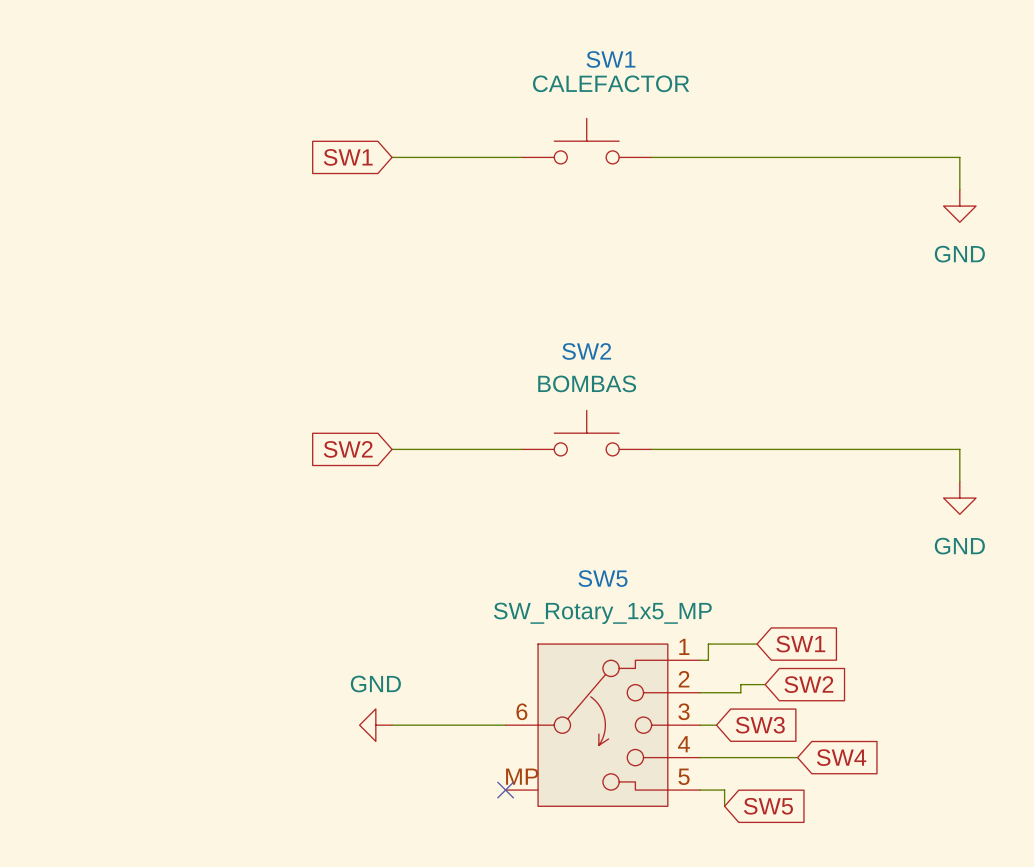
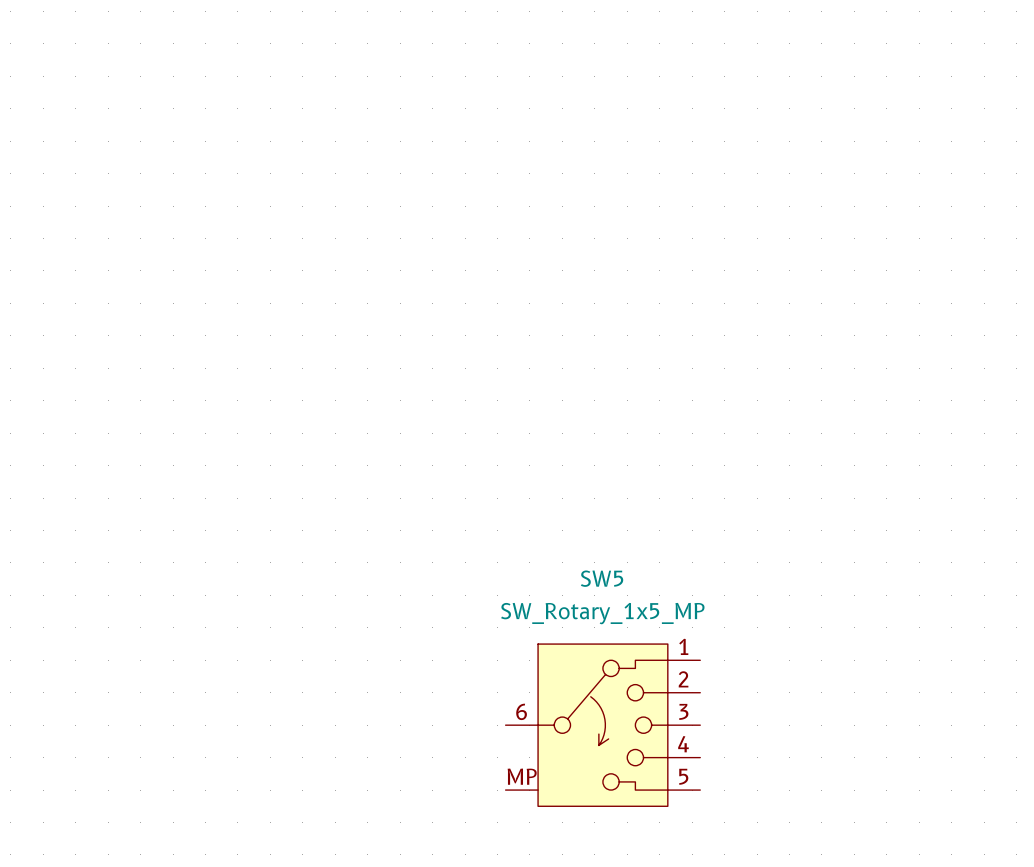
SW1: CALEFACTOR (586, 141) -> none
global label: SW1 (348, 157) -> none
wire: (392, 157) (521, 157) -> none
wire: (651, 157) (959, 157) (959, 189) -> none
power symbol: GND (959, 206) -> none
SW2: BOMBAS (586, 433) -> none
global label: SW2 (348, 449) -> none
wire: (392, 449) (521, 449) -> none
wire: (651, 449) (959, 449) (959, 481) -> none
power symbol: GND (959, 498) -> none
wire: (757, 644) (708, 644) (708, 660) (700, 660) -> none
global label: SW1 (800, 644) -> none
wire: (765, 684) (740, 684) (740, 692) (700, 692) -> none
global label: SW2 (808, 684) -> none
power symbol: GND (375, 725) -> none
wire: (392, 725) (505, 725) -> none
wire: (700, 725) (716, 725) -> none
global label: SW3 (760, 725) -> none
wire: (700, 757) (797, 757) -> none
global label: SW4 (841, 757) -> none
no-connect mark: (505, 790) -> none
wire: (700, 790) (724, 790) (724, 806) -> none
global label: SW5 (768, 806) -> none

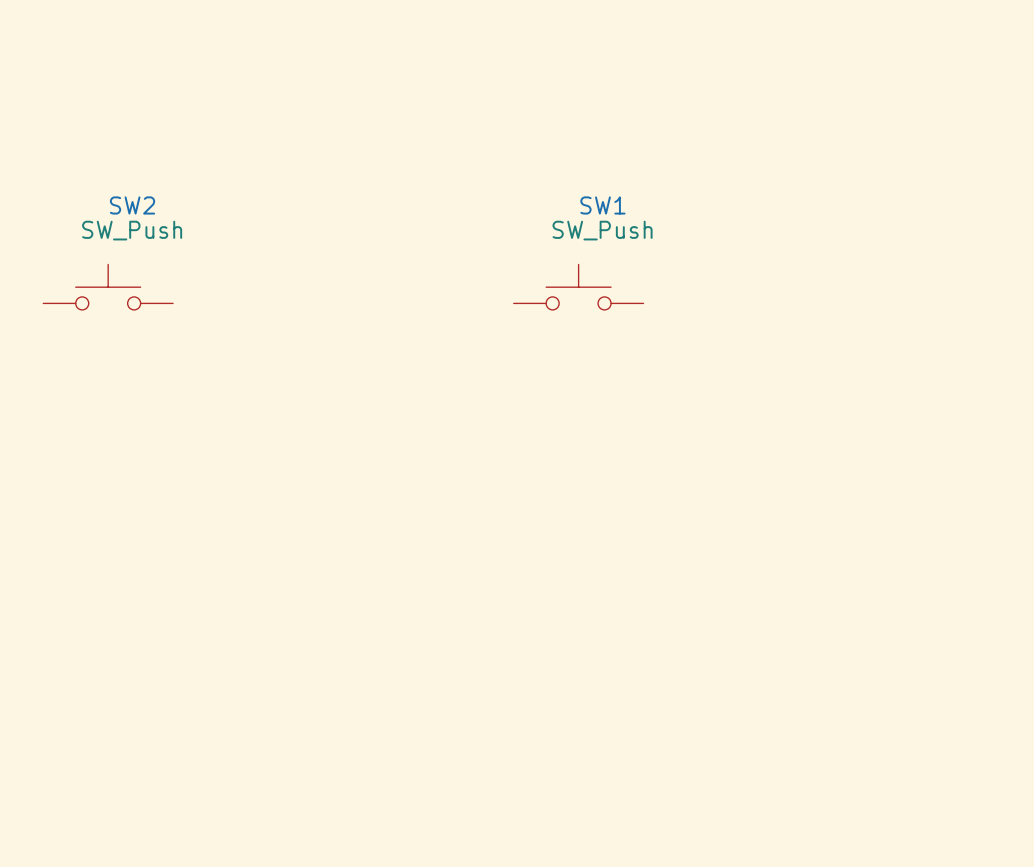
SW2: none -> SW_Push (108, 287)
SW1: none -> SW_Push (578, 287)
SW5: SW_Rotary_1x5_MP (602, 725) -> none

